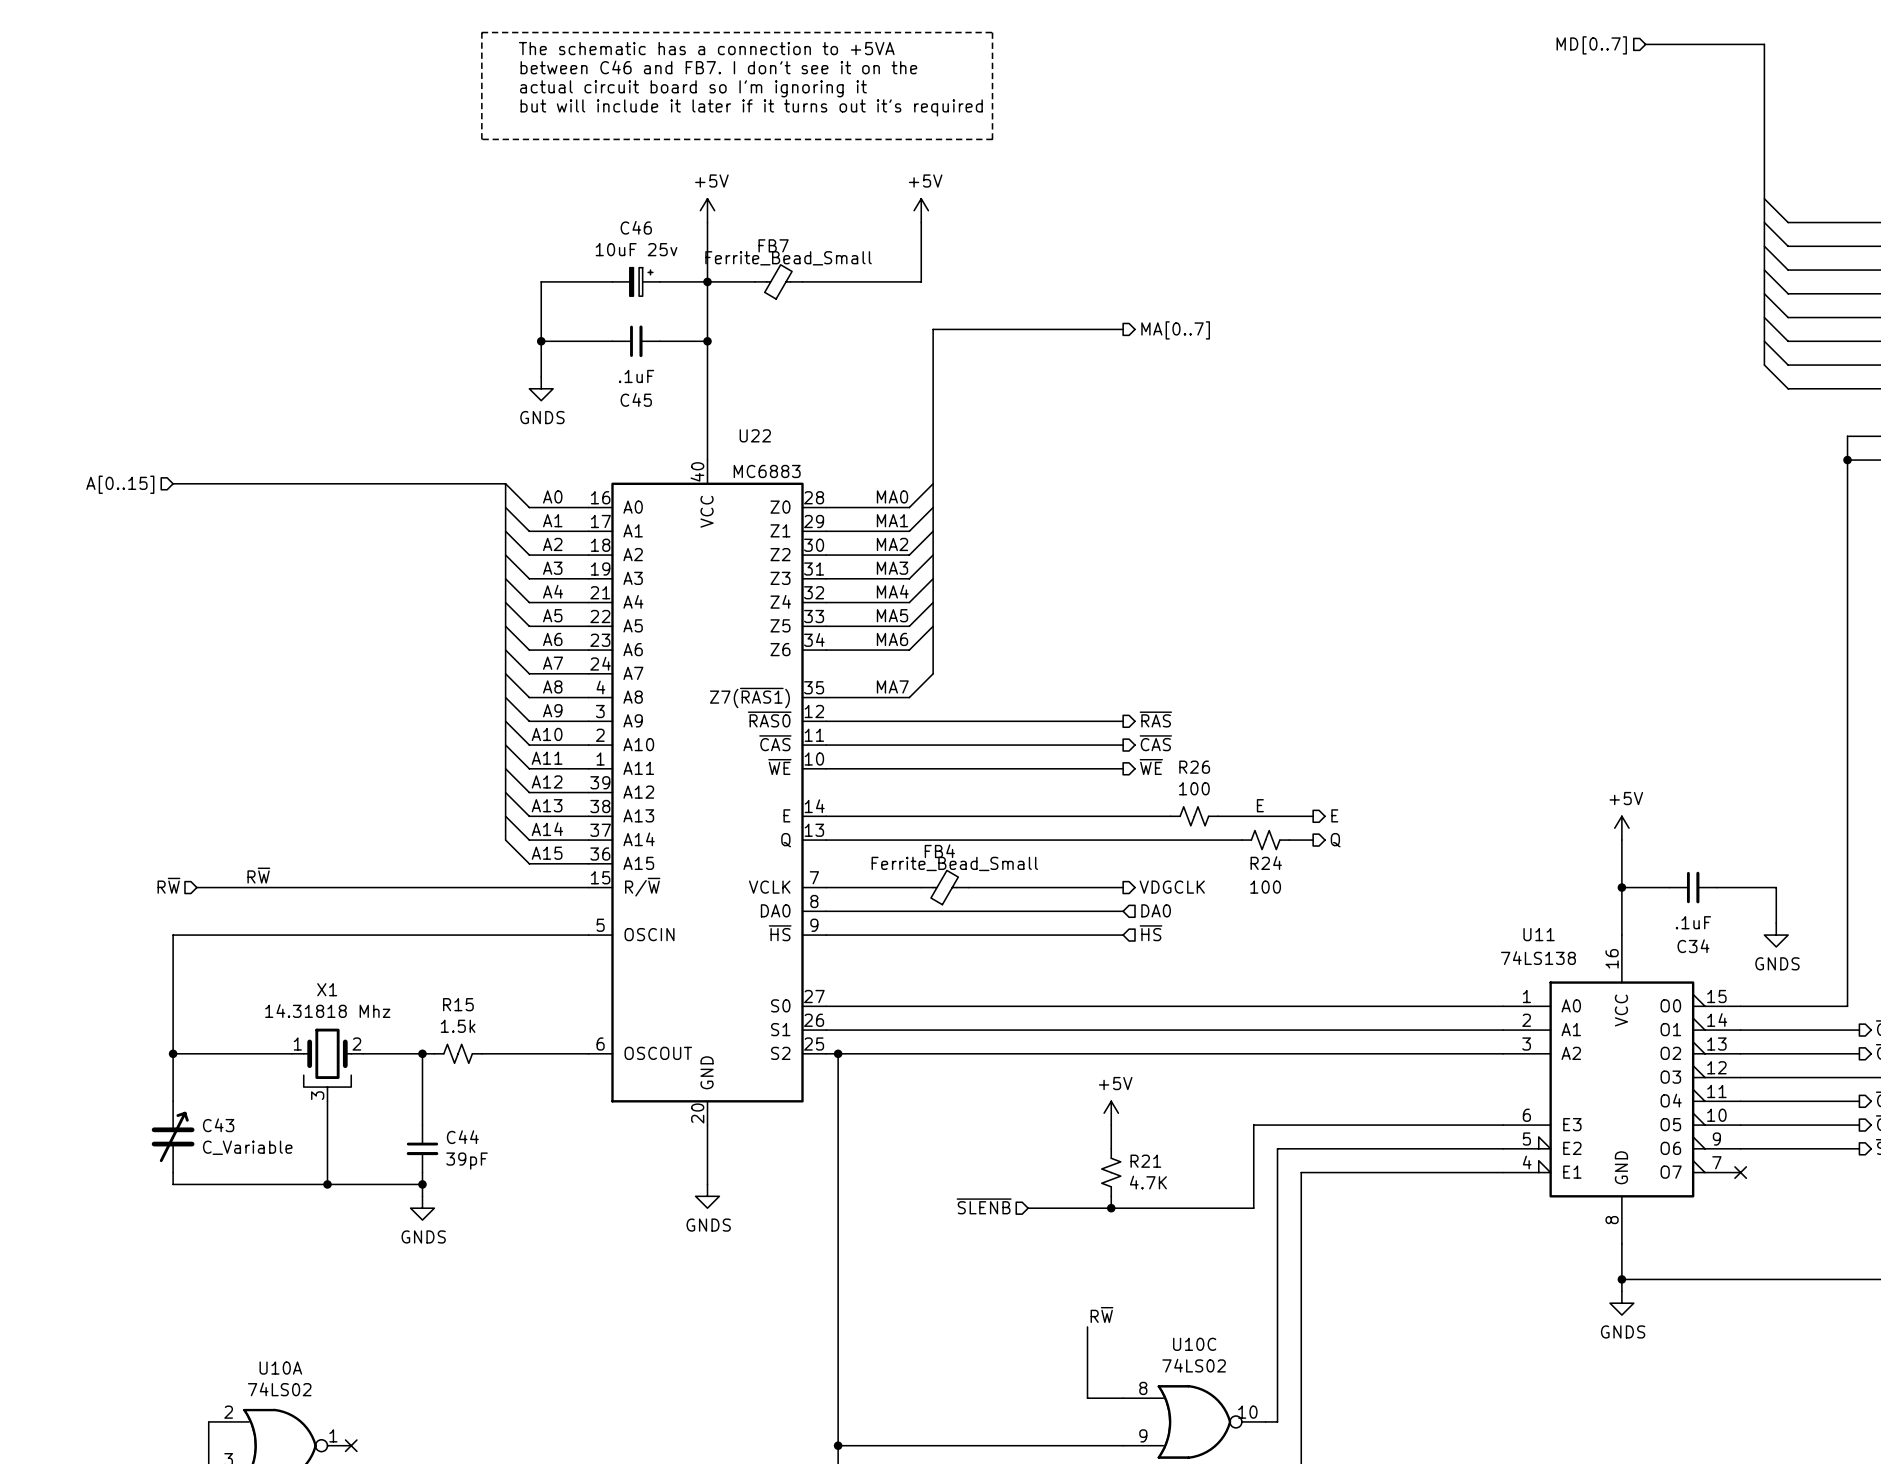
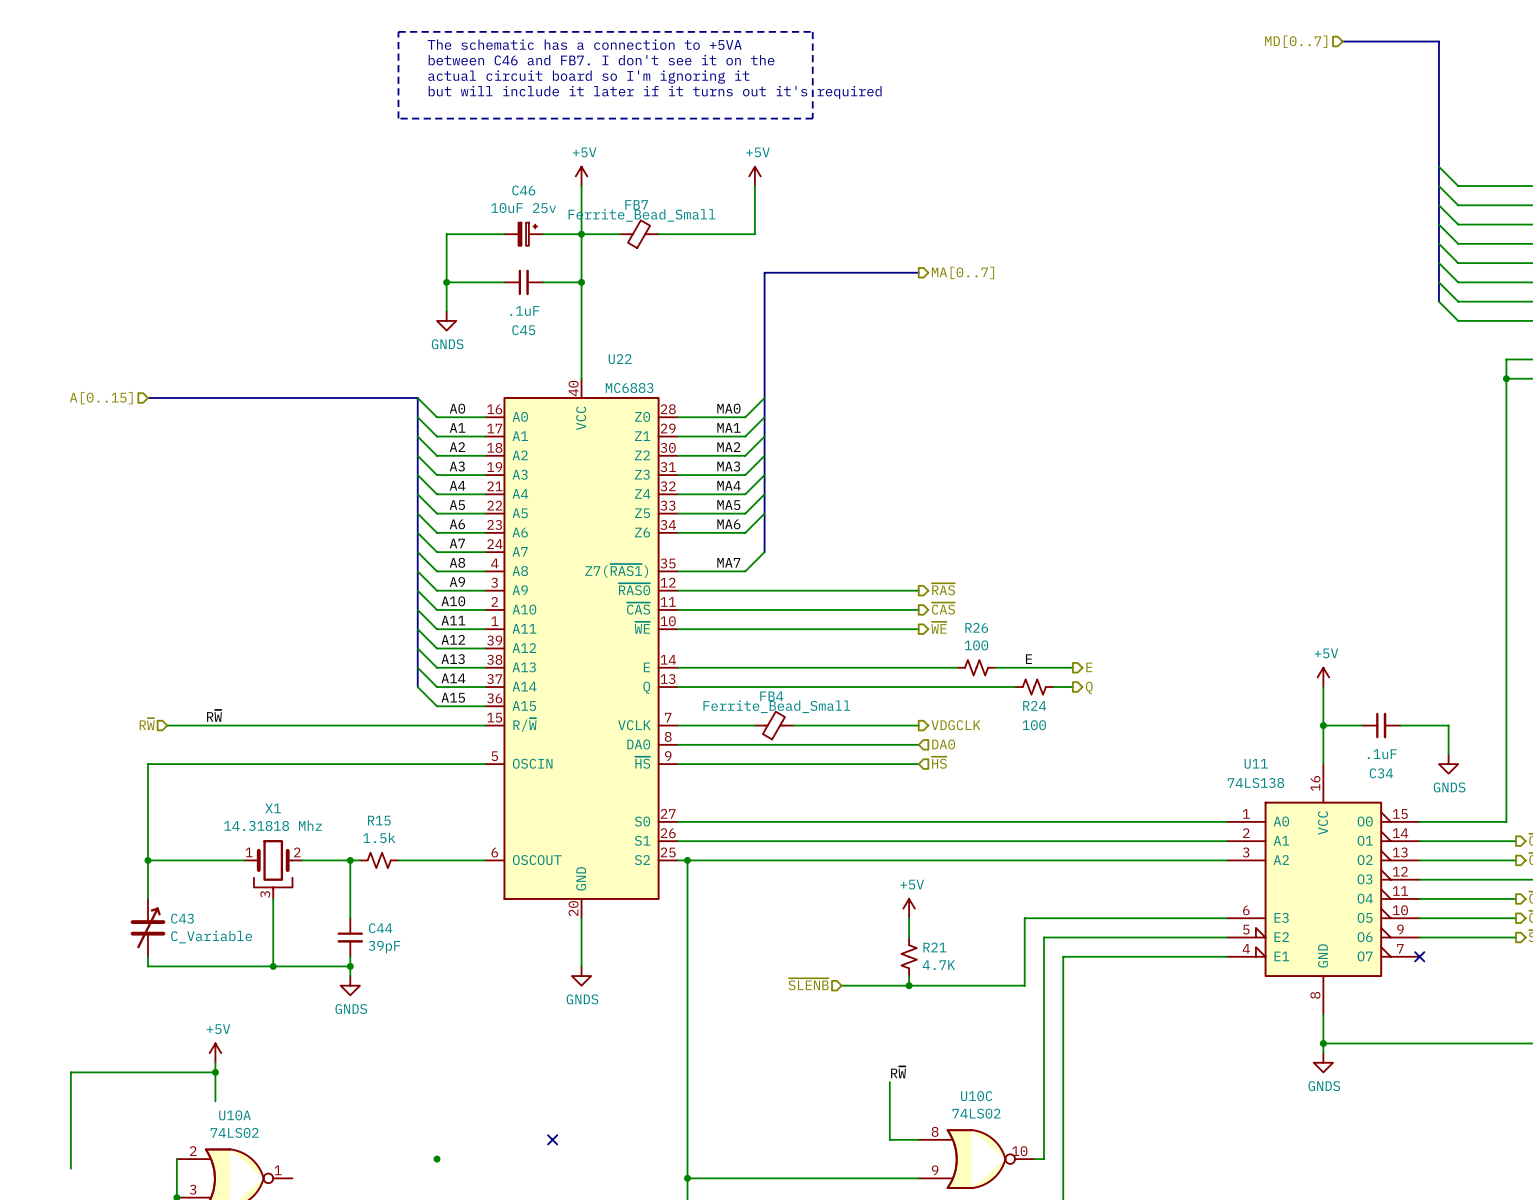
power symbol: none -> +5V (215, 1053)
wire: none -> (215, 1062) (215, 1101)
wire: none -> (215, 1072) (70, 1072) (70, 1168)
junction: none -> (215, 1072)
no-connect mark: none -> (552, 1139)
junction: none -> (437, 1159)
no-connect mark: (351, 1445) -> none

